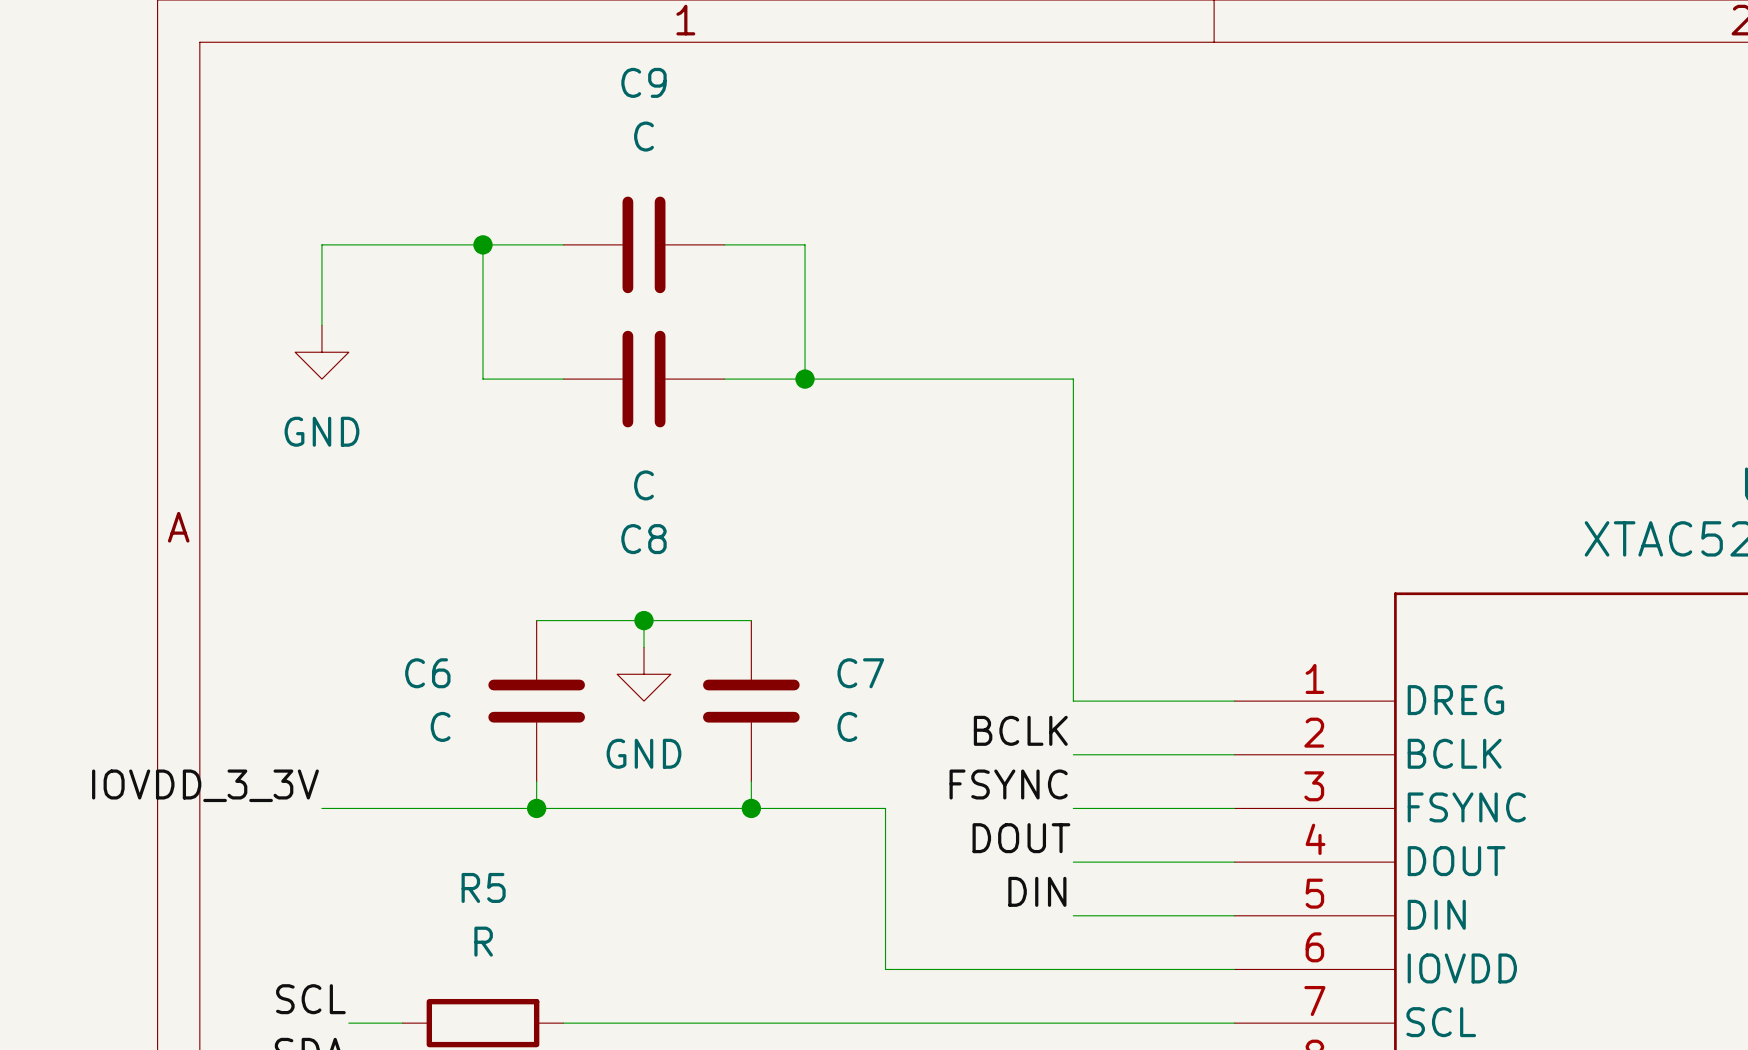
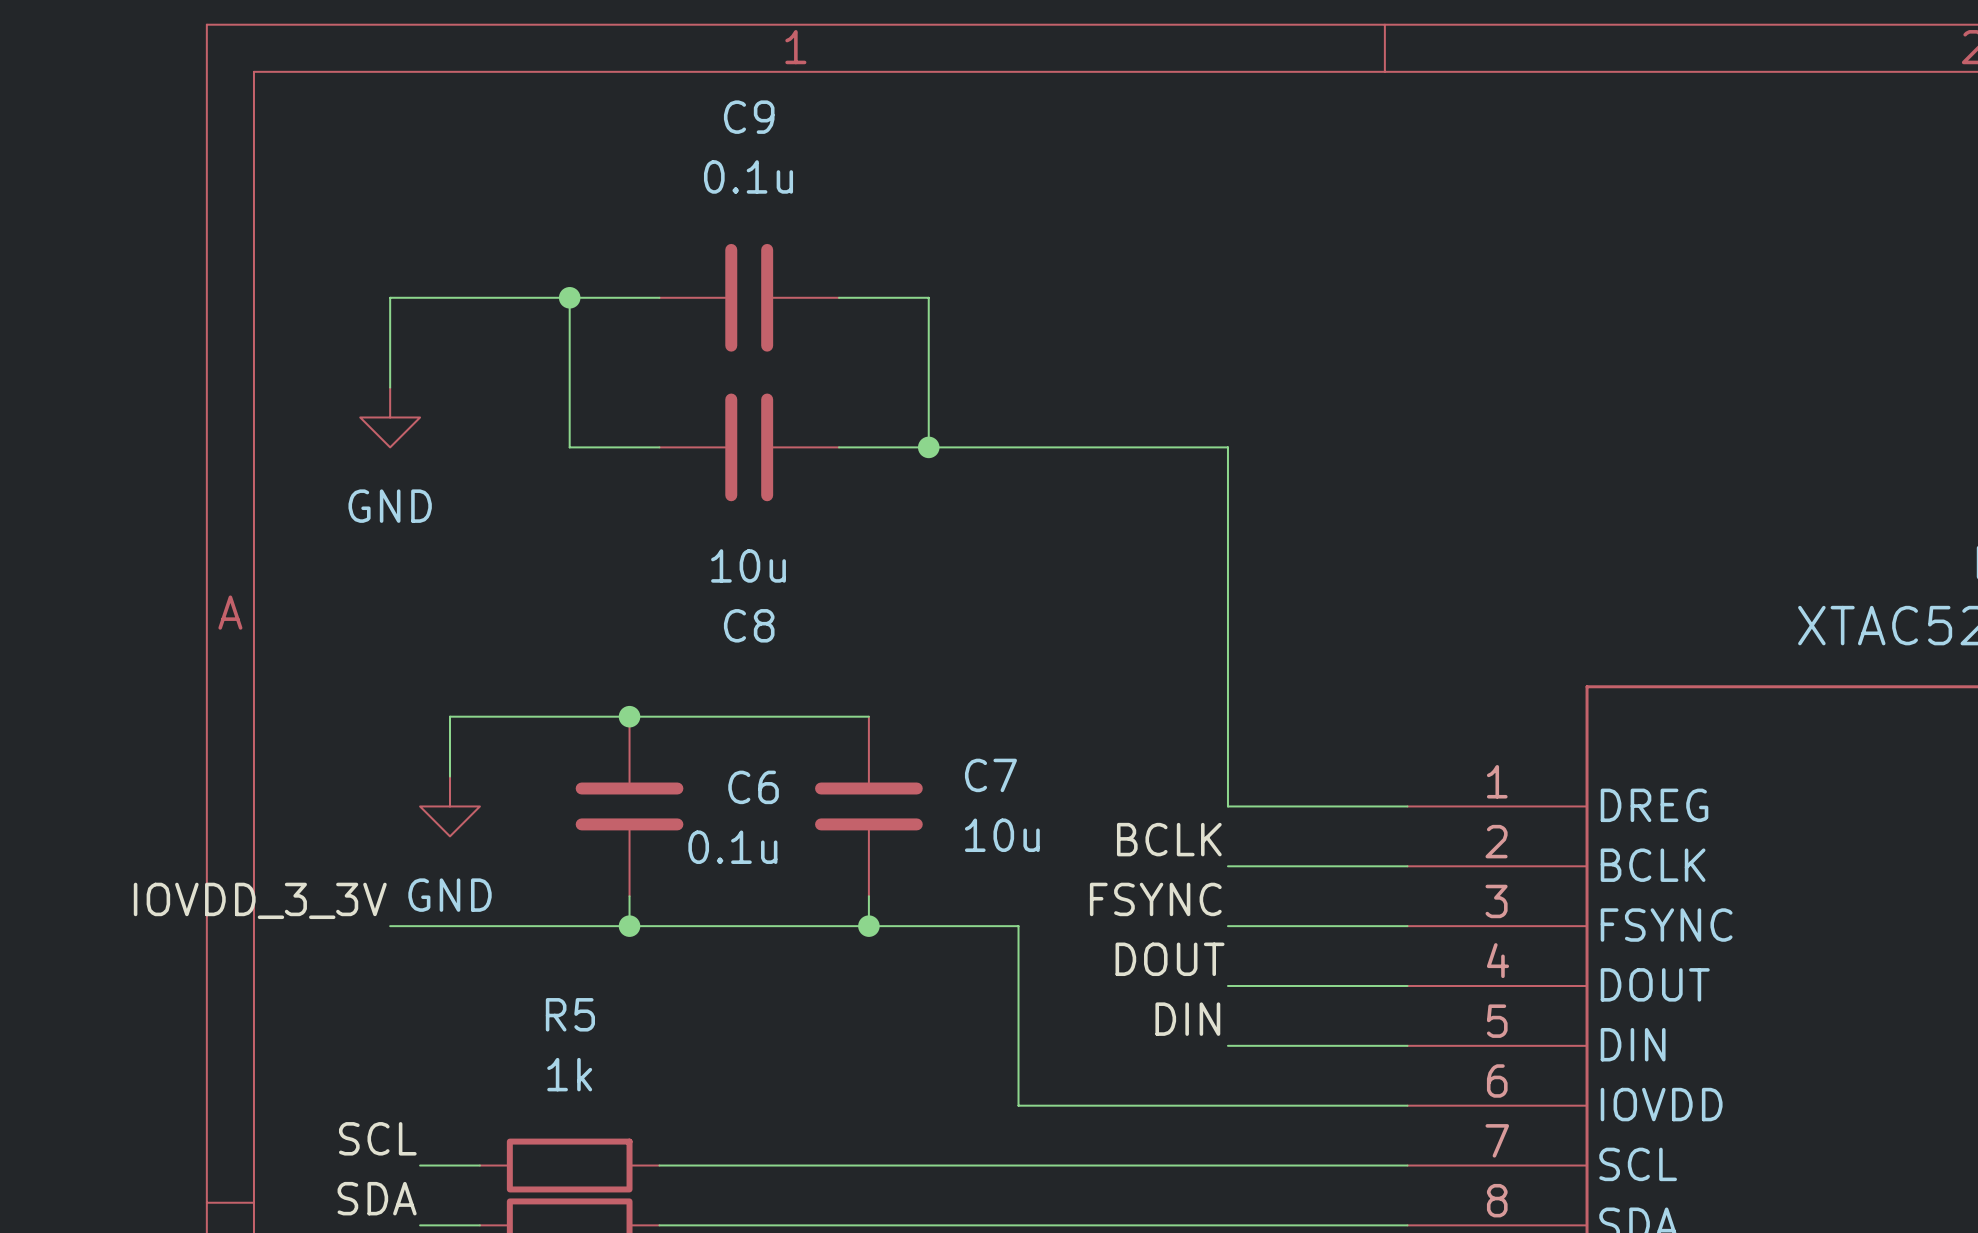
C9 value: C (644, 136) -> 0.1u (748, 176)
C8 value: C (644, 485) -> 10u (748, 565)
wire: none -> (629, 716) (450, 716) (450, 776)
wire: (644, 620) (644, 647) -> none
junction position: (644, 620) -> (629, 716)
C6 name position: C6 (427, 673) -> C6 (753, 787)
power symbol position: GND (644, 674) -> GND (450, 806)
C6 value: C (440, 726) -> 0.1u (732, 847)
C7 value: C (847, 726) -> 10u (1002, 835)
R5 value: R (483, 941) -> 1k (569, 1074)

